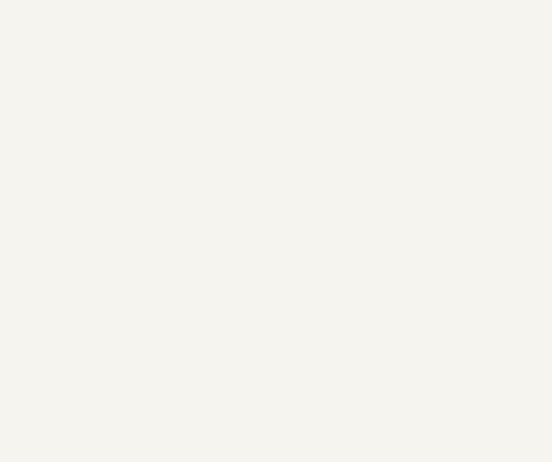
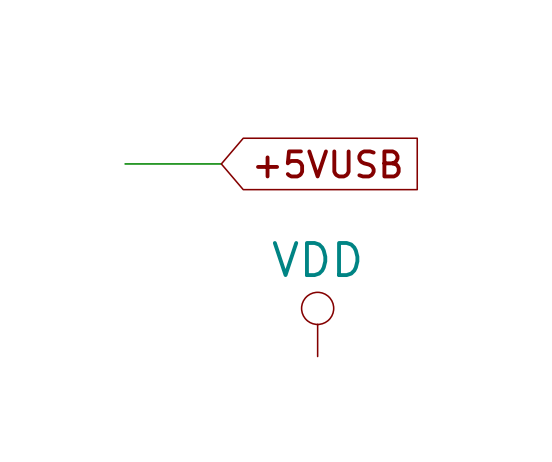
wire: none -> (125, 163) (221, 163)
global label: none -> +5VUSB (328, 163)
power symbol: none -> VDD (317, 324)

